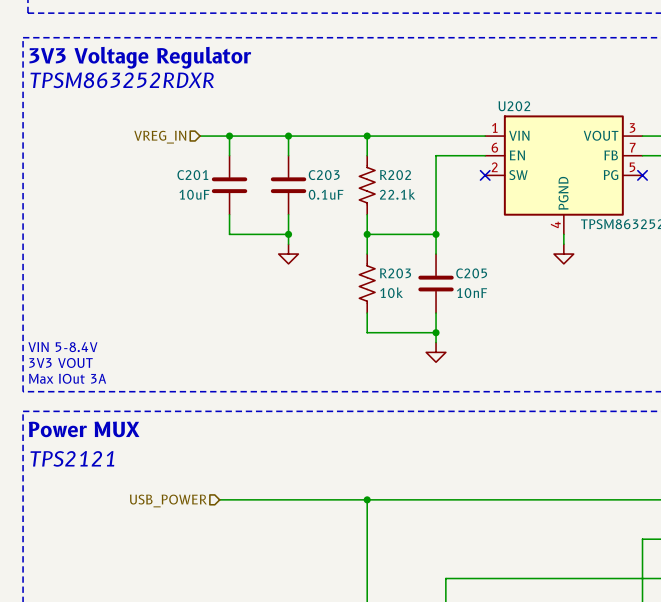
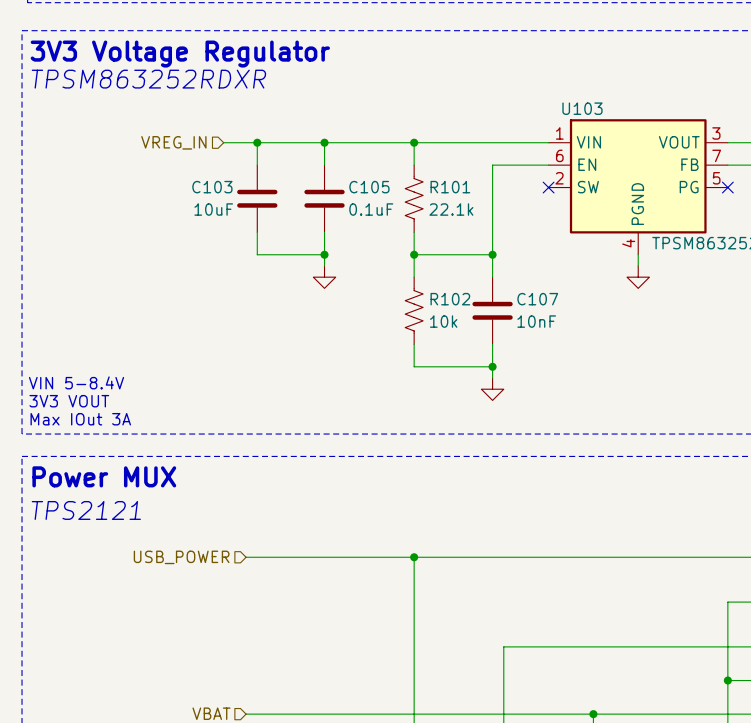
U202 name: U202 (514, 106) -> U103 (582, 108)
C201 name: C201 (192, 175) -> C103 (212, 187)
C203 name: C203 (324, 175) -> C105 (369, 187)
R202 name: R202 (395, 175) -> R101 (450, 187)
R203 name: R203 (395, 273) -> R102 (450, 299)
C205 name: C205 (471, 273) -> C107 (537, 299)

